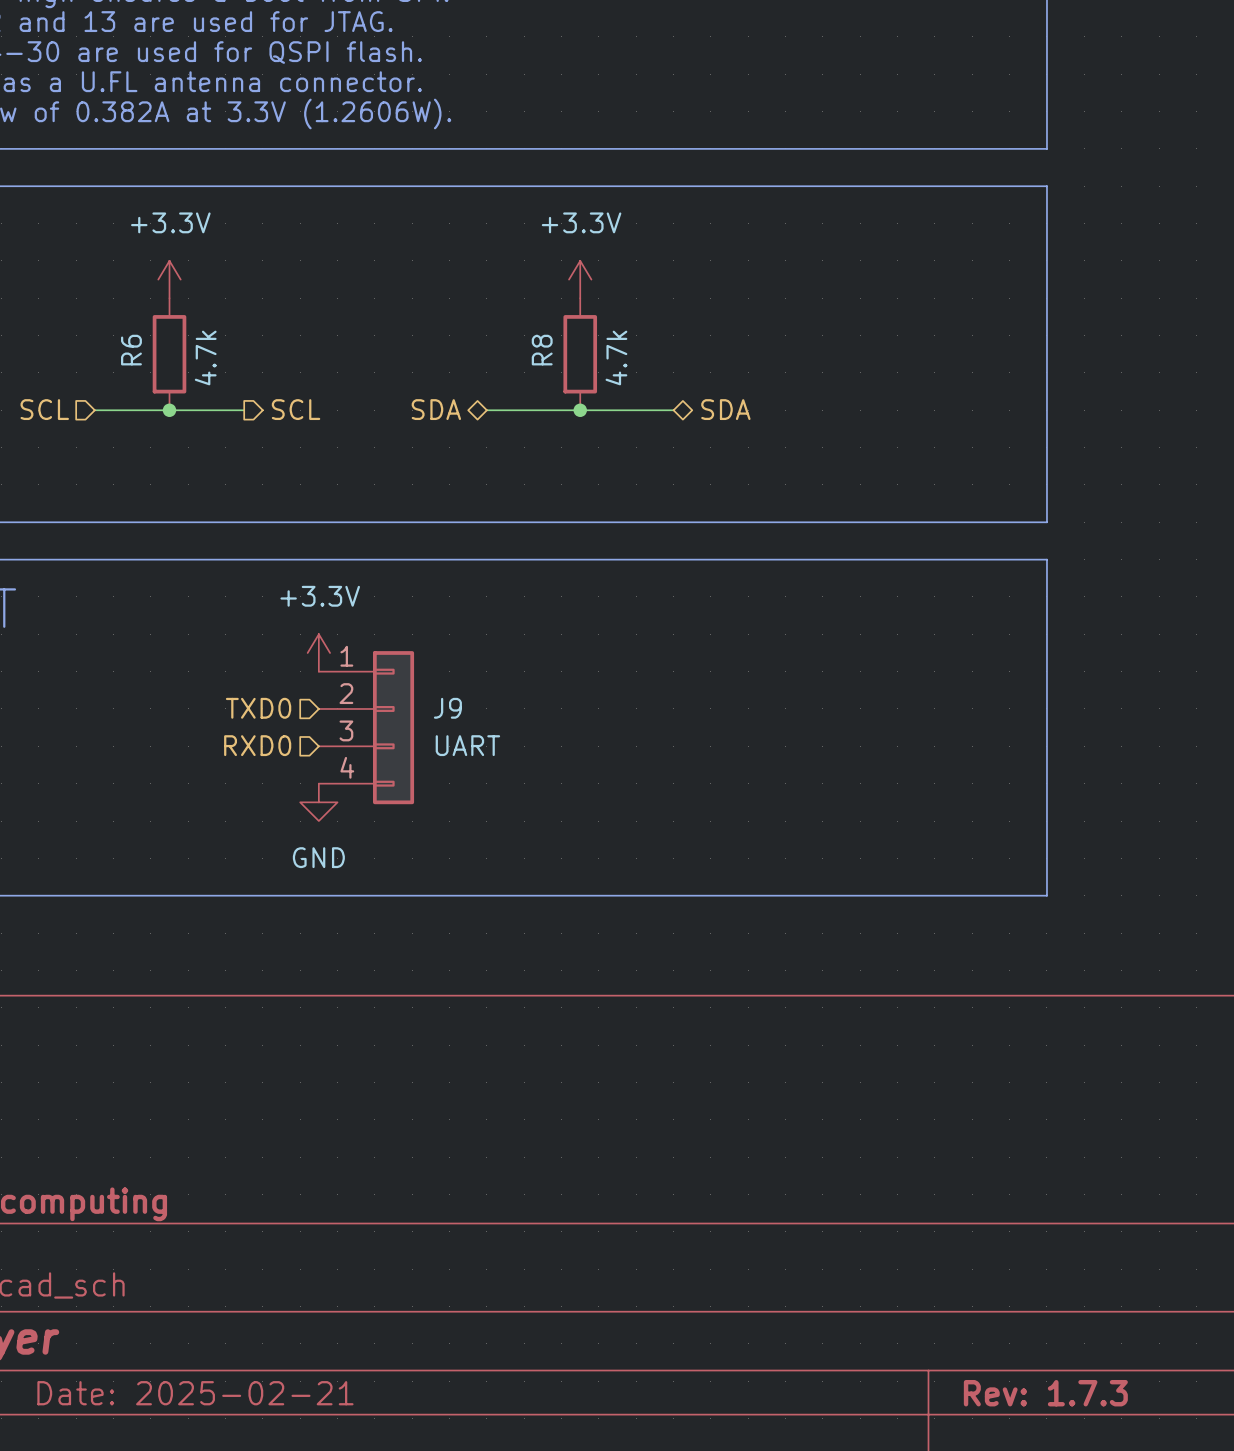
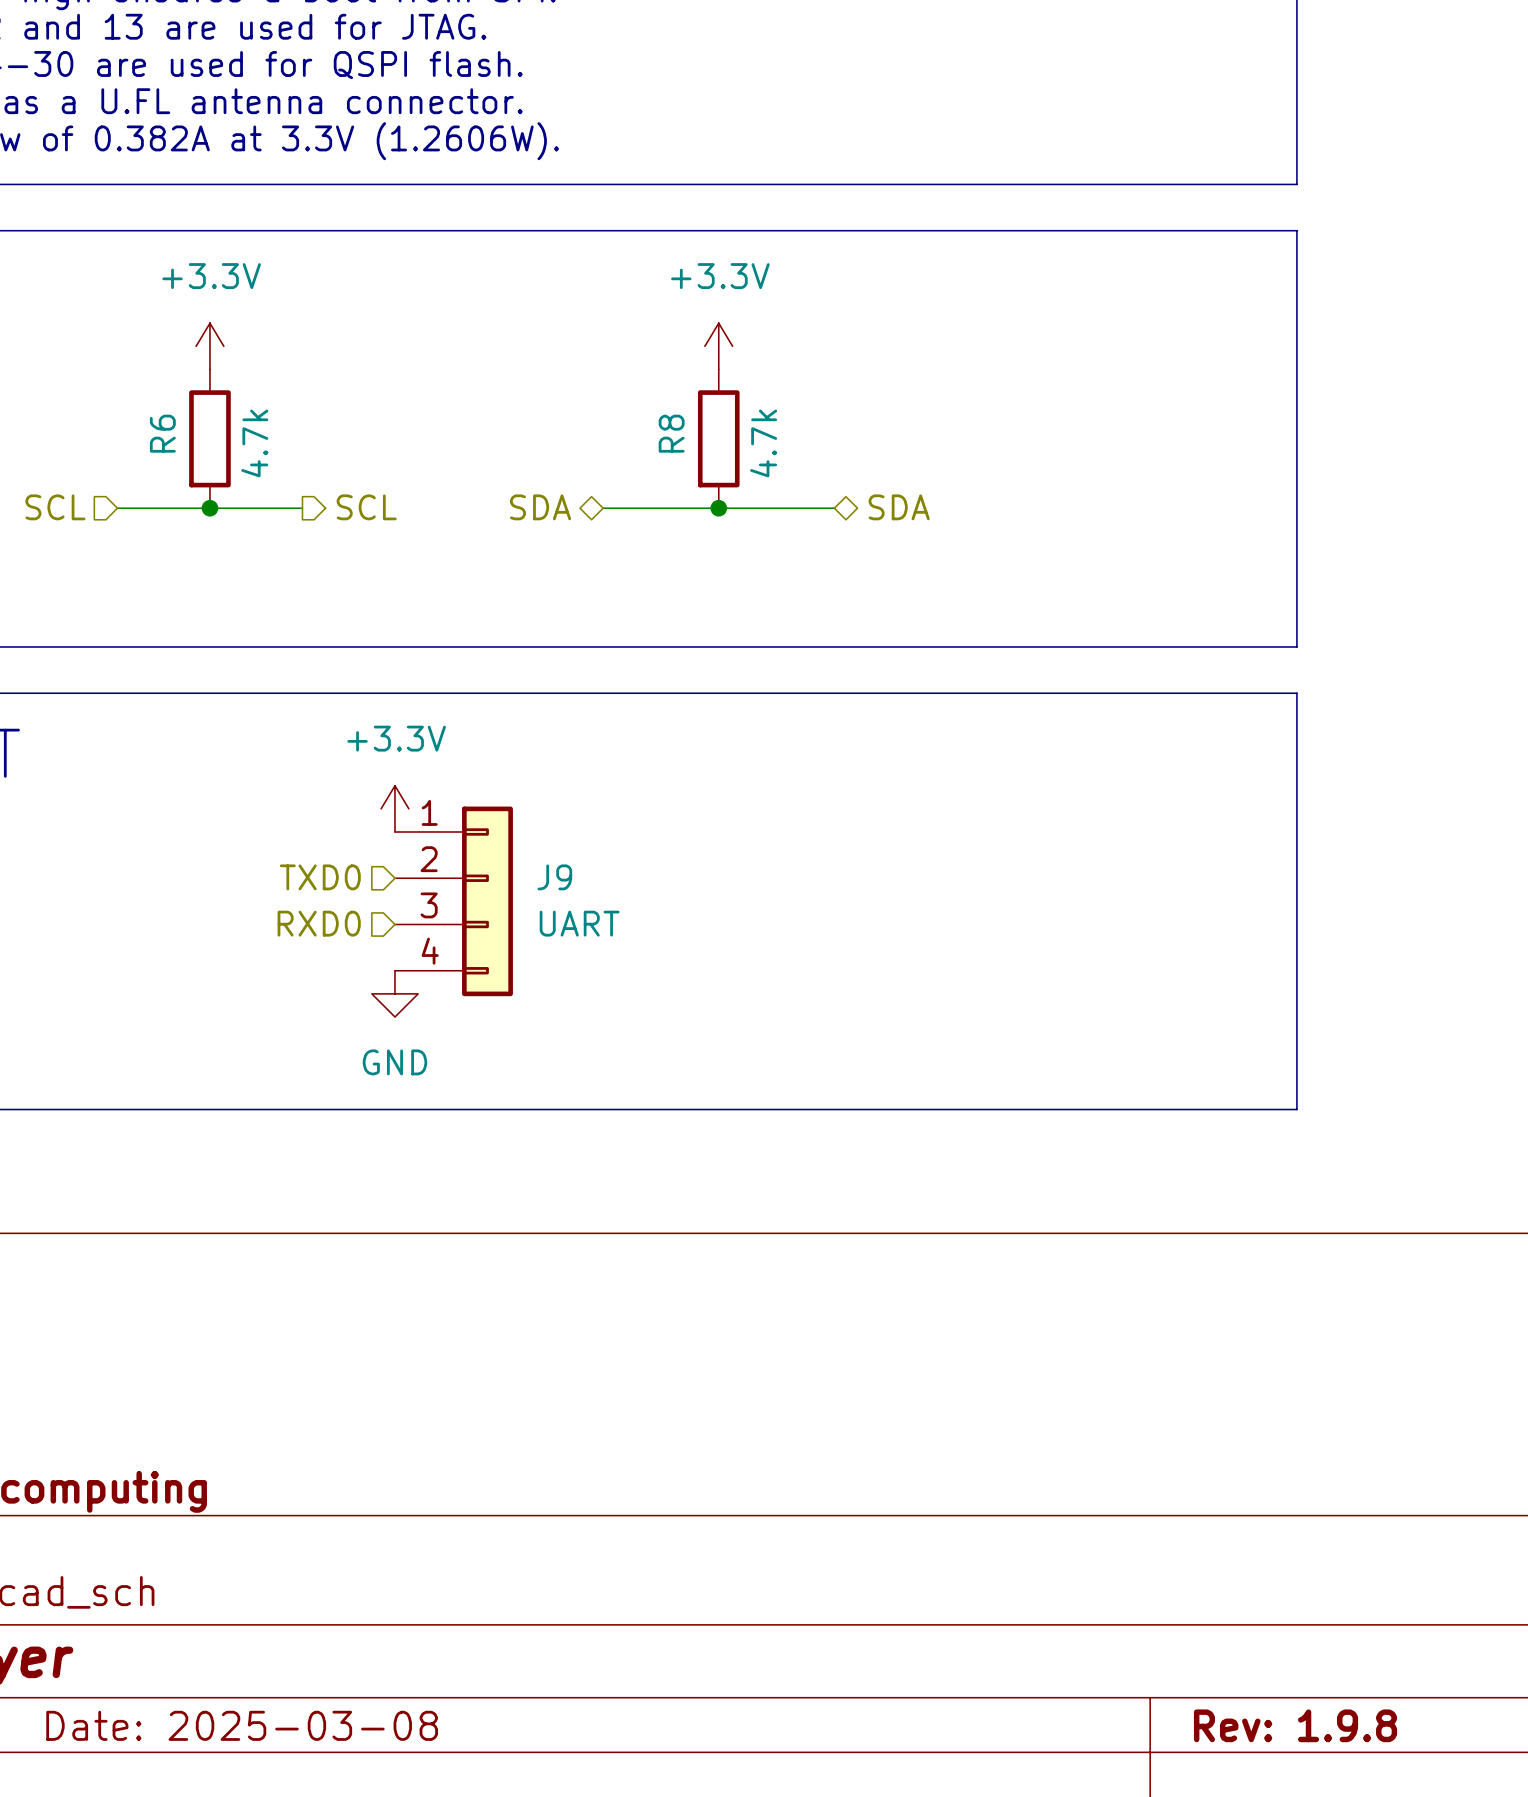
title block: Date: 2025-02-21 (195, 1393) -> Date: 2025-03-08 (242, 1725)
title block: Rev: 1.7.3 (1045, 1393) -> Rev: 1.9.8 (1295, 1725)

